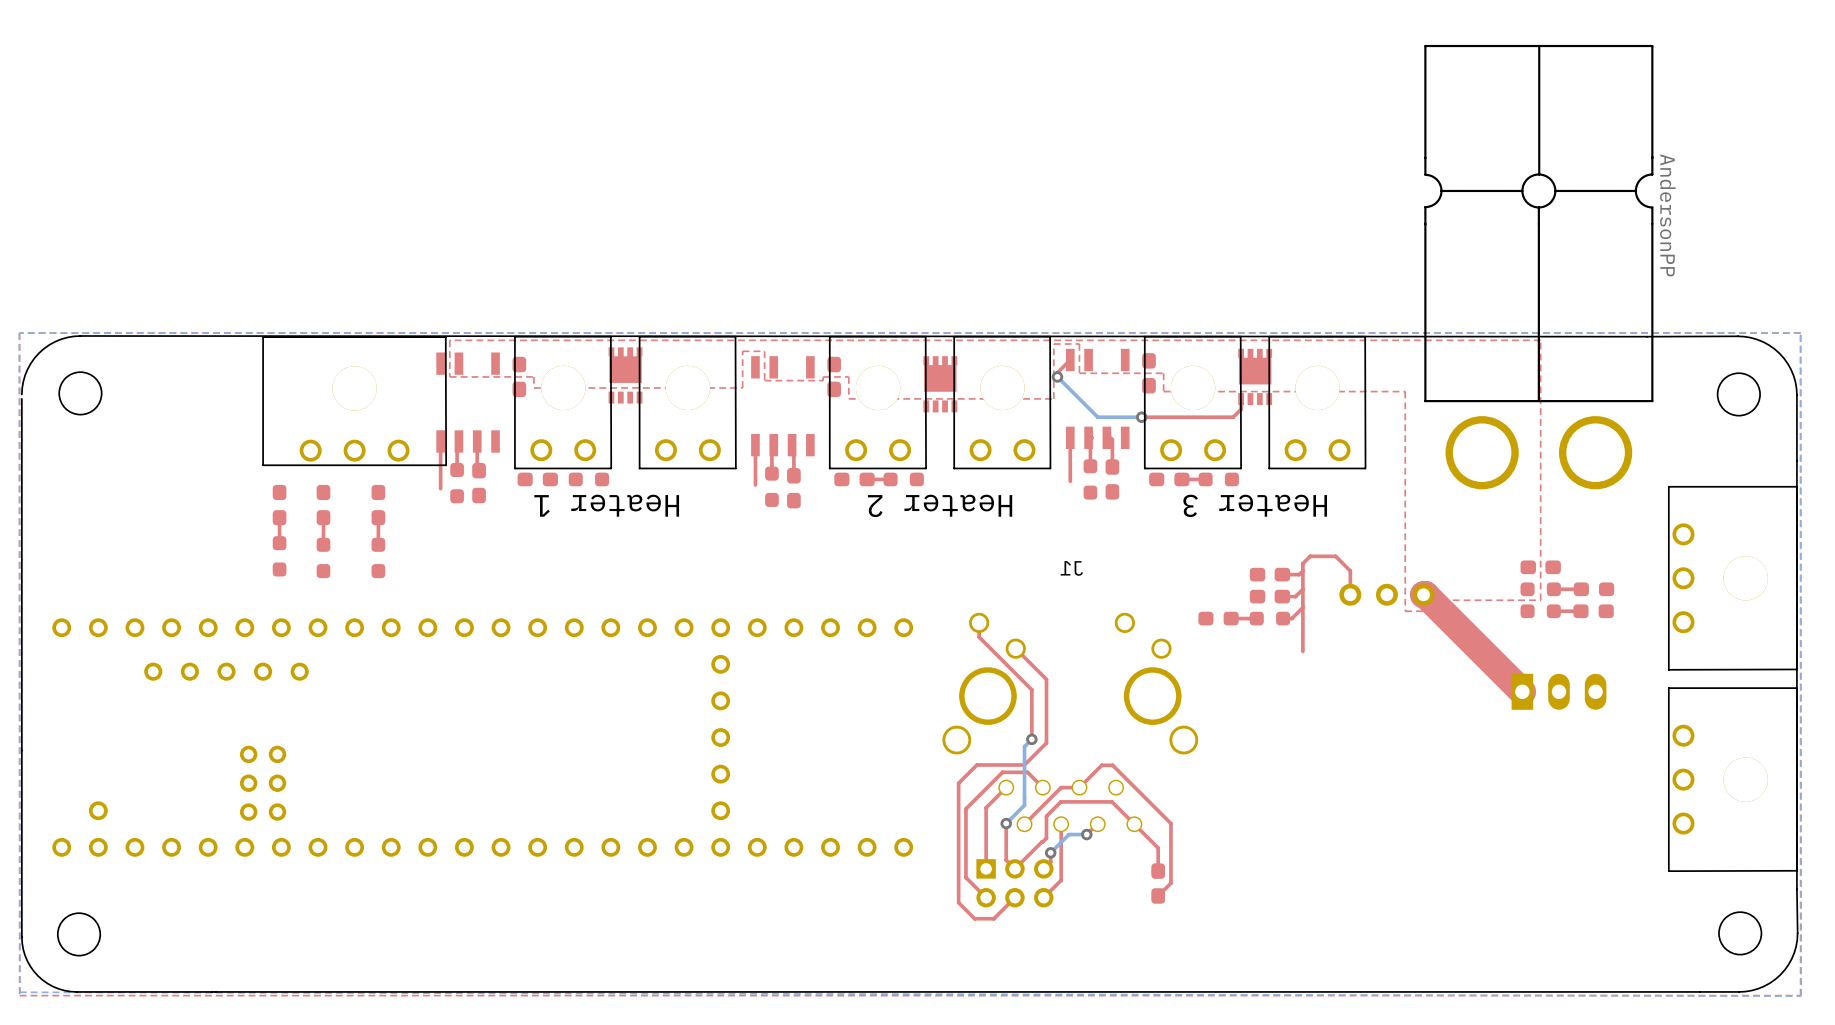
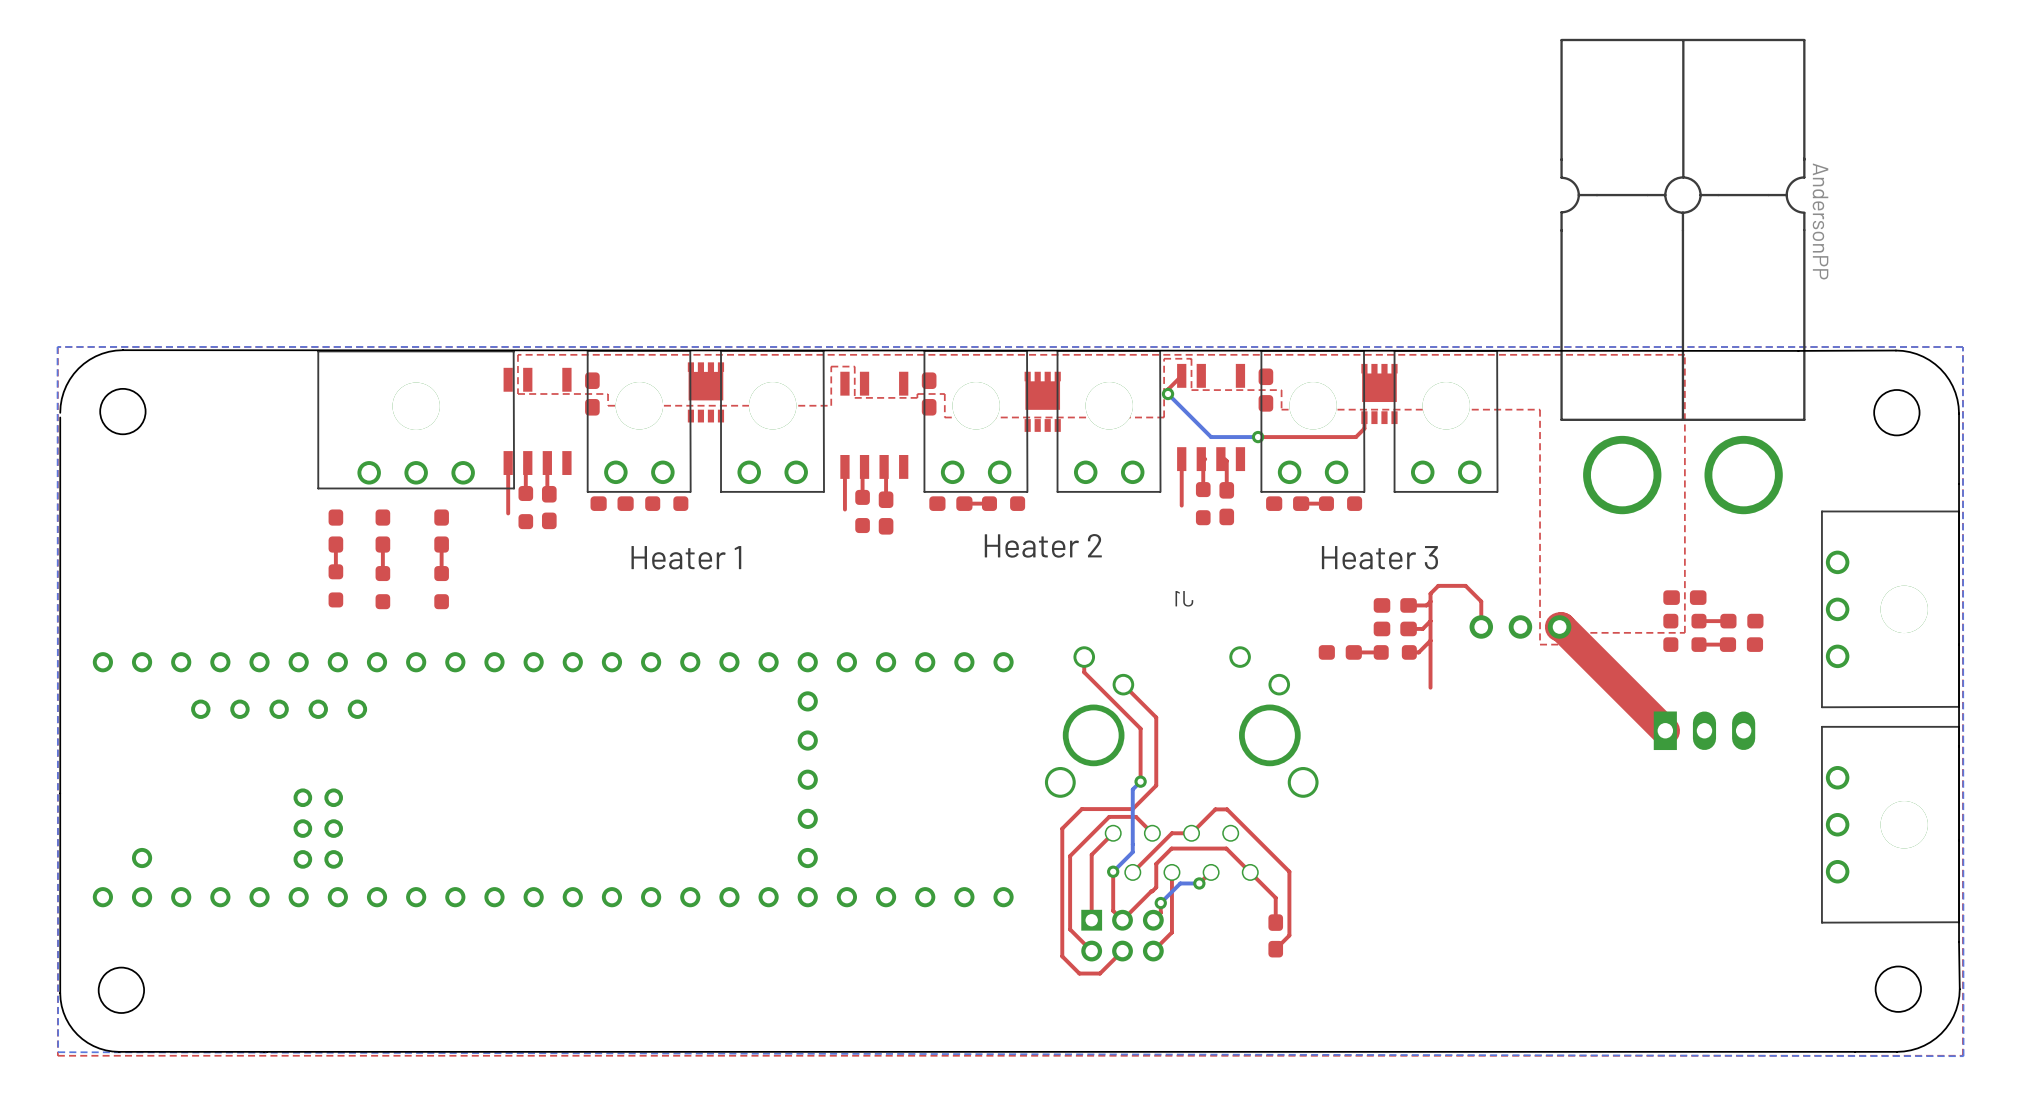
text rotation: 0° (606, 505) -> 180° (686, 557)
text rotation: 0° (940, 505) -> 180° (1043, 545)
text rotation: 0° (1255, 505) -> 180° (1379, 557)

